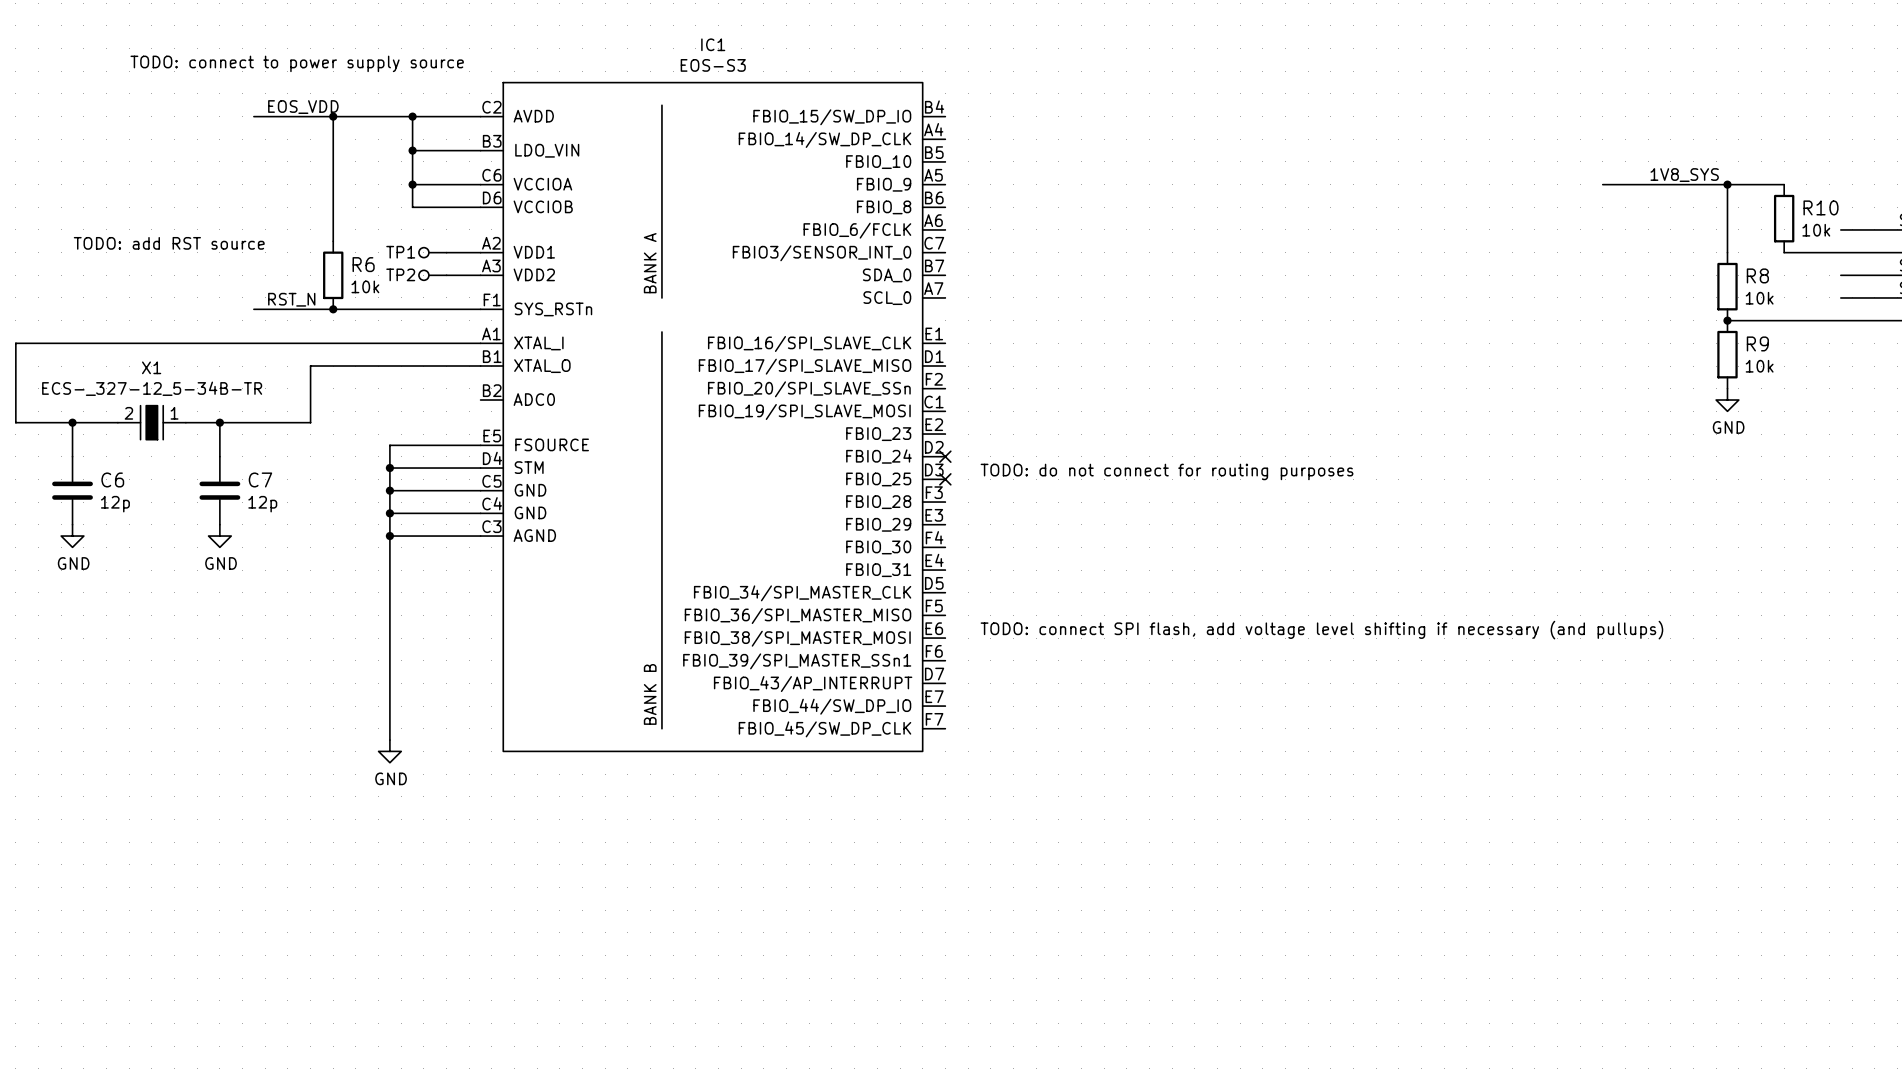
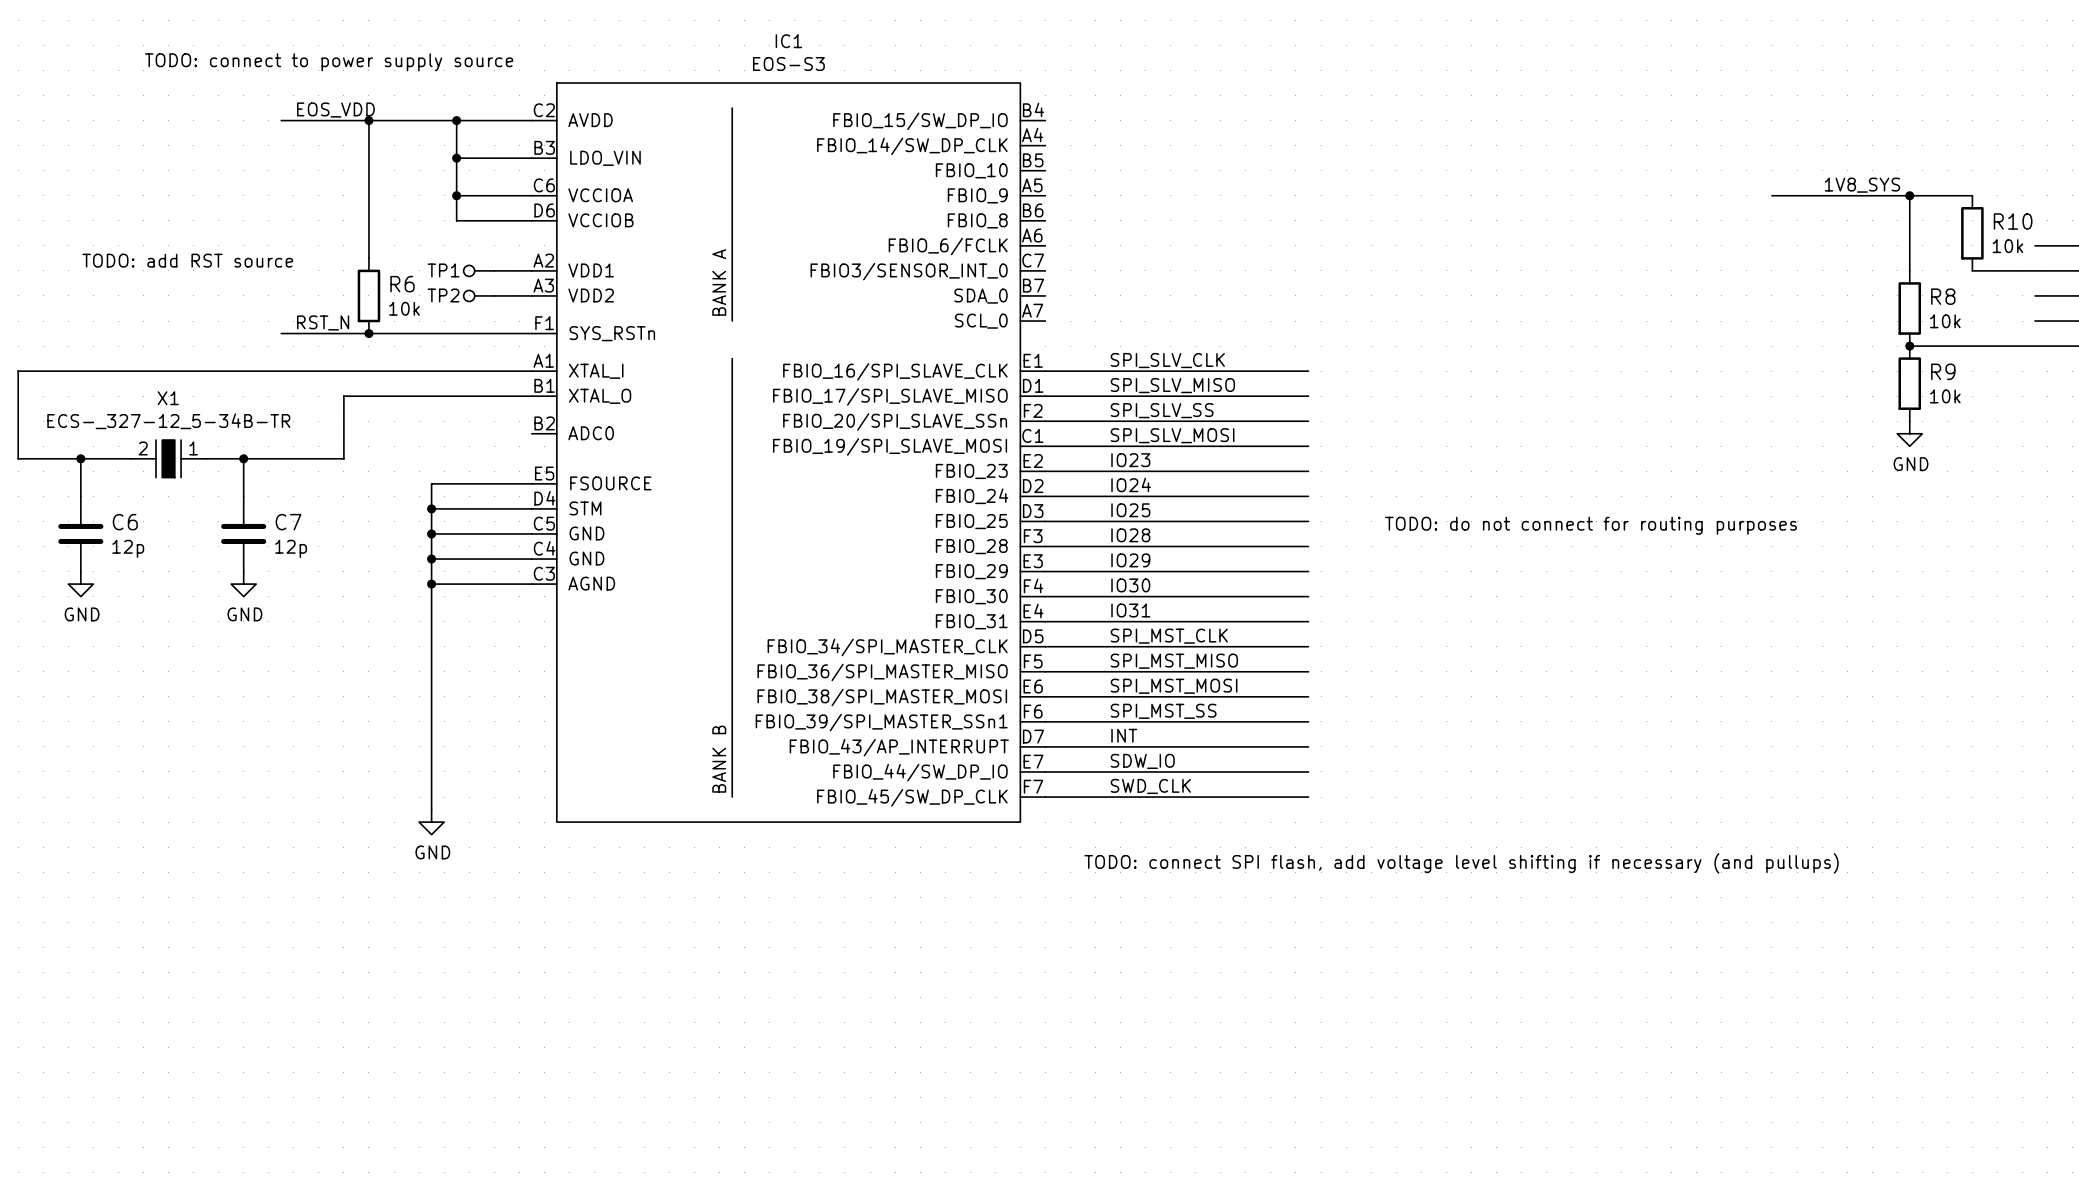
label: none -> SPI_SLV_CLK (1167, 360)
wire: none -> (1045, 371) (1308, 371)
label: none -> SPI_SLV_MISO (1172, 385)
wire: none -> (1045, 396) (1308, 396)
label: none -> SPI_SLV_SS (1162, 410)
wire: none -> (1045, 421) (1308, 421)
label: none -> SPI_SLV_MOSI (1172, 435)
wire: none -> (1045, 446) (1308, 446)
label: none -> IO23 (1130, 460)
wire: none -> (1045, 471) (1308, 471)
label: none -> IO24 (1131, 484)
wire: none -> (1045, 496) (1308, 496)
no-connect mark: (945, 456) -> none
label: none -> IO25 (1130, 510)
text: TODO: do not connect for routing purposes (1167, 471) -> none
wire: none -> (1045, 521) (1308, 521)
no-connect mark: (945, 479) -> none
text: none -> TODO: do not connect for routing purposes (1591, 525)
label: none -> IO28 (1130, 535)
wire: none -> (1045, 546) (1308, 546)
label: none -> IO29 (1130, 560)
wire: none -> (1045, 571) (1308, 571)
label: none -> IO30 (1130, 585)
wire: none -> (1045, 596) (1308, 596)
label: none -> IO31 (1130, 610)
wire: none -> (1045, 621) (1308, 621)
label: none -> SPI_MST_CLK (1169, 636)
wire: none -> (1045, 646) (1308, 646)
label: none -> SPI_MST_MISO (1174, 661)
wire: none -> (1045, 671) (1308, 671)
label: none -> SPI_MST_MOSI (1174, 686)
text position: TODO: connect SPI flash, add voltage level shifting if necessary (and pullups) (1321, 630) -> TODO: connect SPI flash, add voltage level shifting if necessary (and pullups) (1461, 863)
wire: none -> (1045, 696) (1308, 696)
label: none -> SPI_MST_SS (1163, 711)
wire: none -> (1045, 721) (1308, 721)
label: none -> INT (1124, 735)
wire: none -> (1045, 746) (1308, 746)
label: none -> SDW_IO (1142, 761)
wire: none -> (1045, 771) (1308, 771)
label: none -> SWD_CLK (1150, 786)
wire: none -> (1045, 797) (1308, 797)

